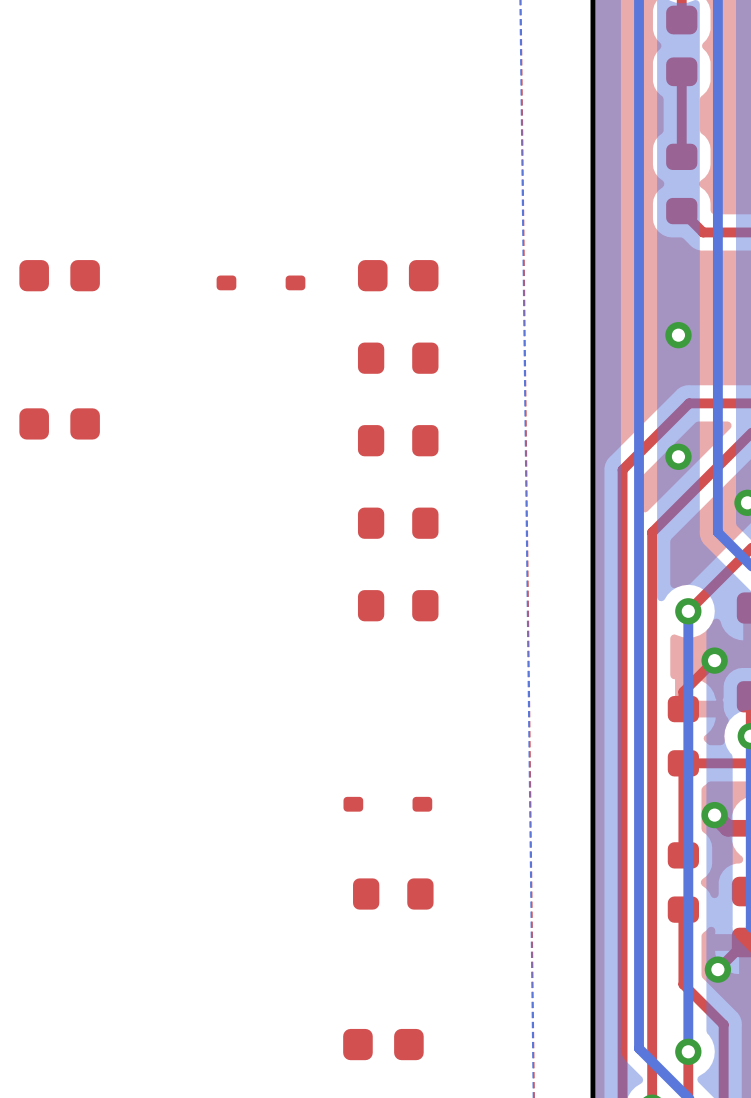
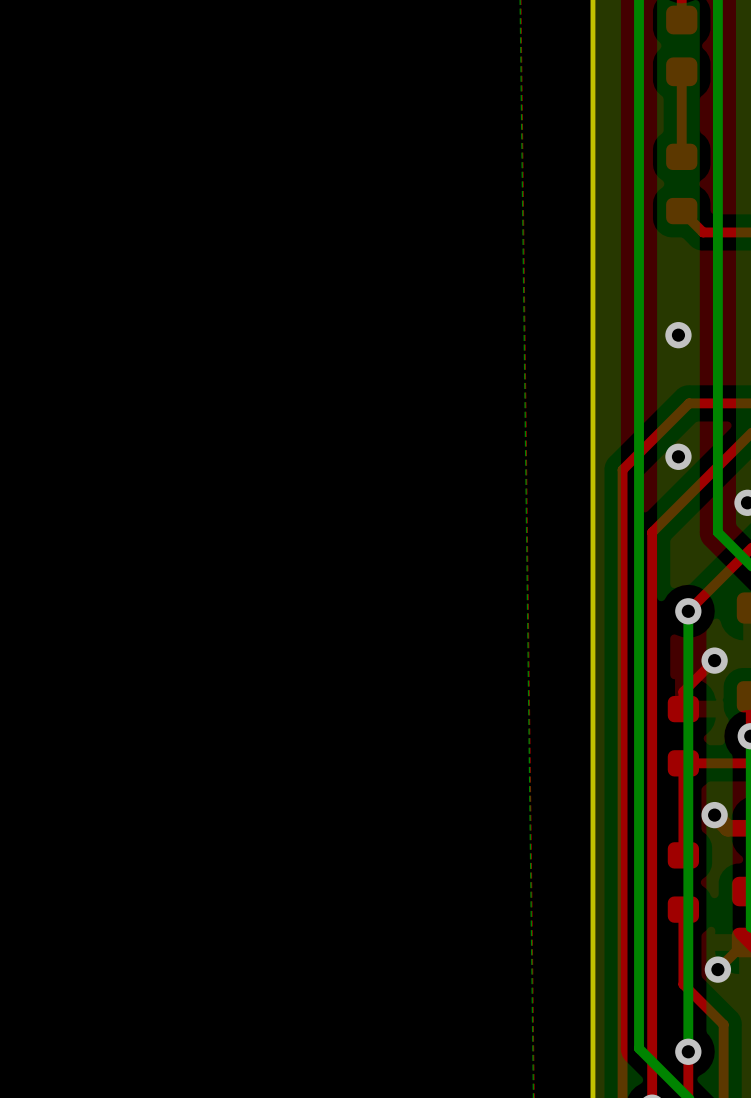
part: (59, 275) -> none
part: (398, 275) -> none
part: (260, 282) -> none
part: (398, 358) -> none
part: (59, 423) -> none
part: (398, 440) -> none
part: (398, 523) -> none
part: (398, 605) -> none
part: (387, 804) -> none
part: (393, 894) -> none
part: (383, 1044) -> none

